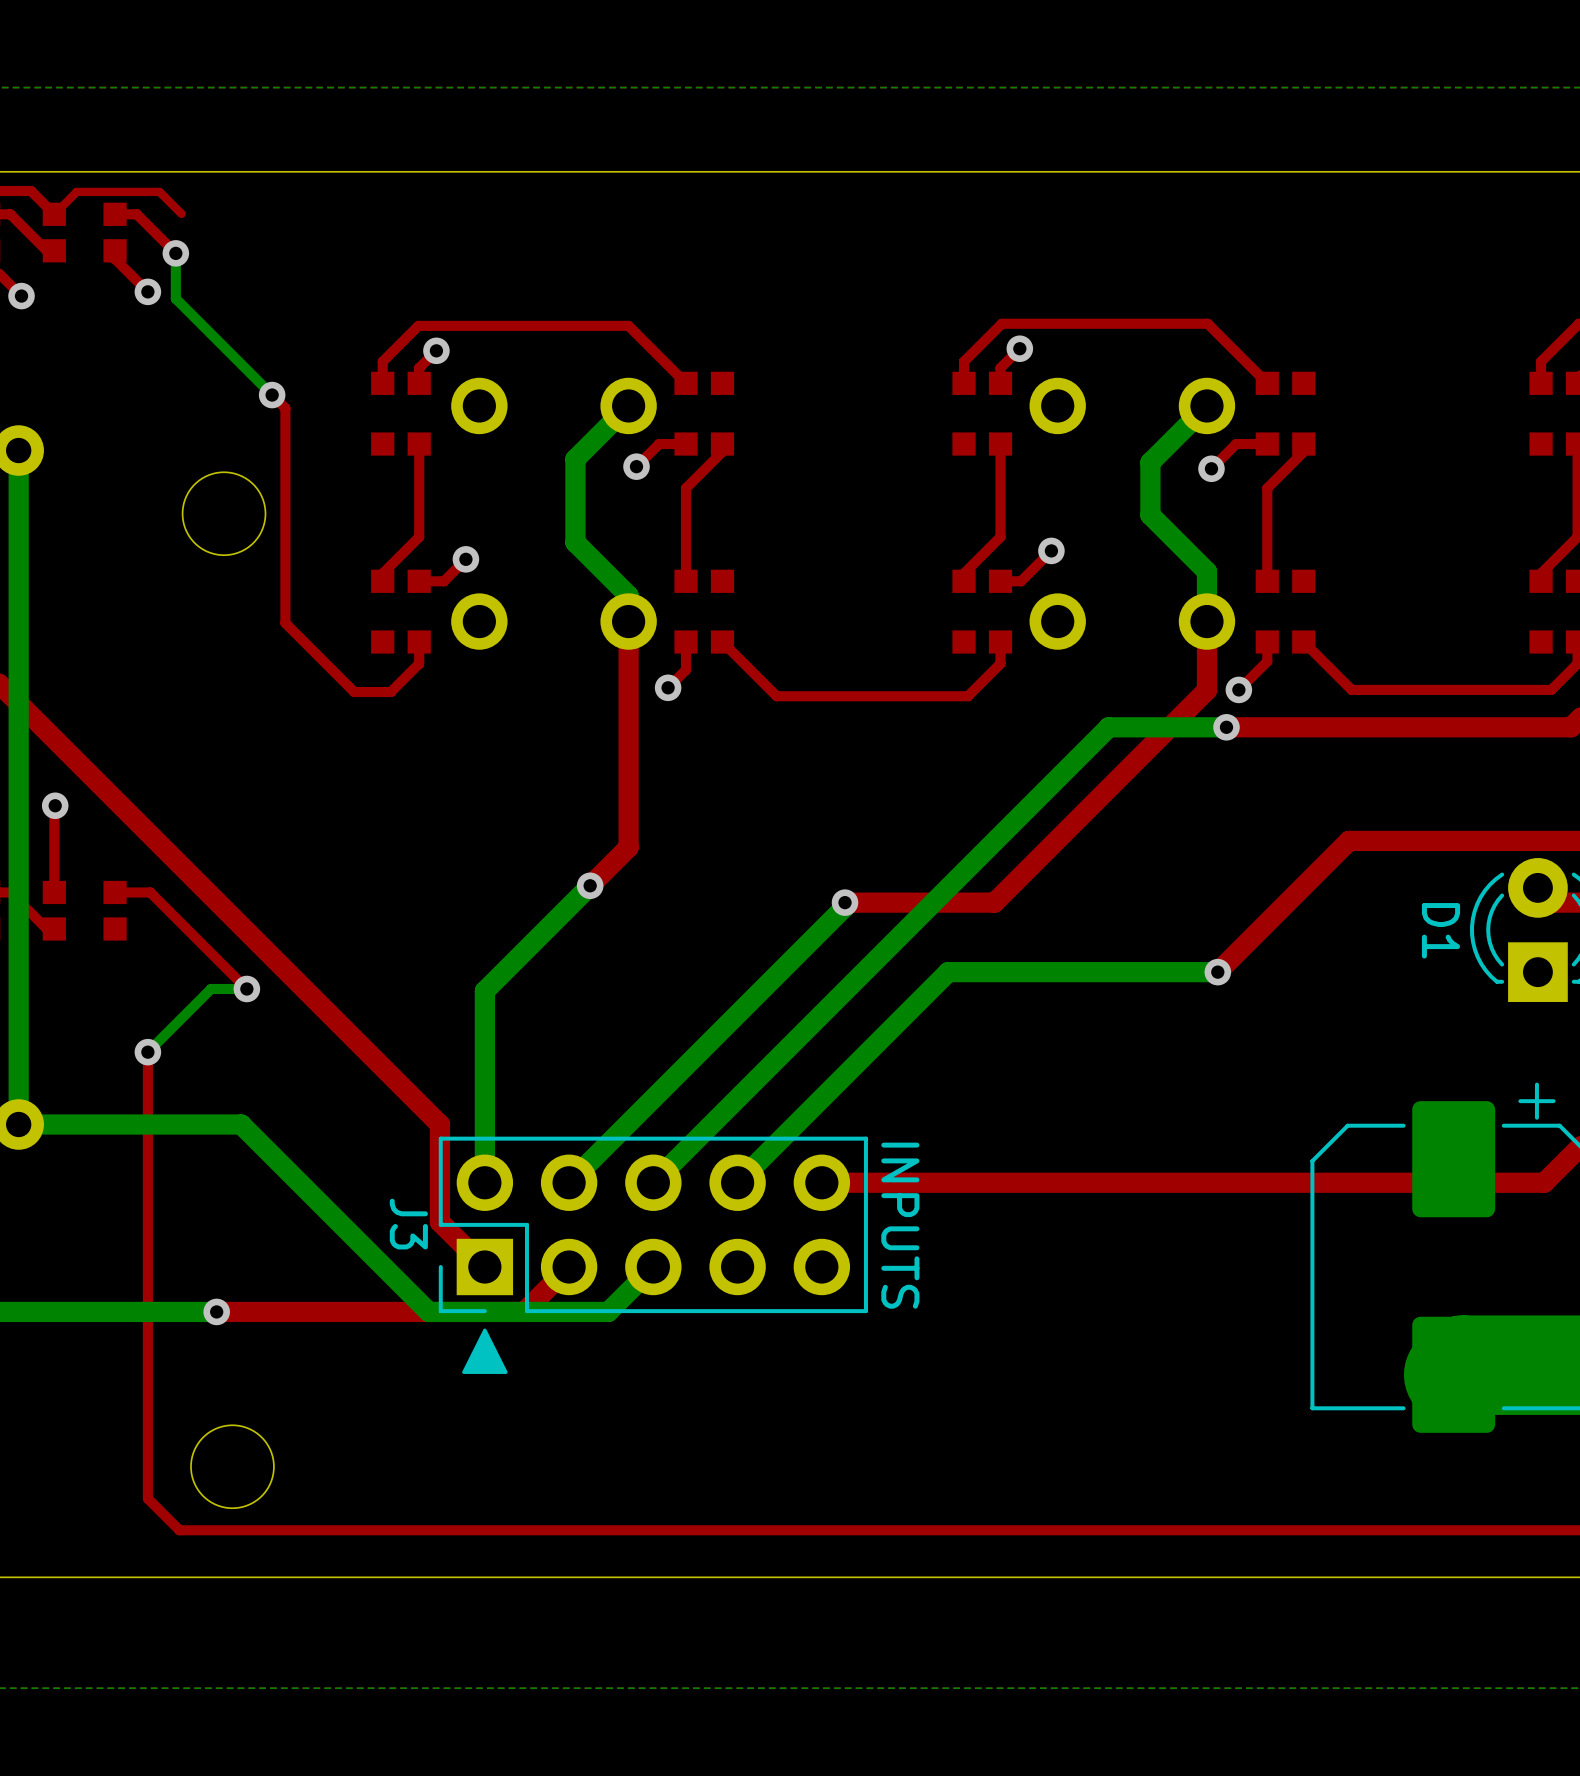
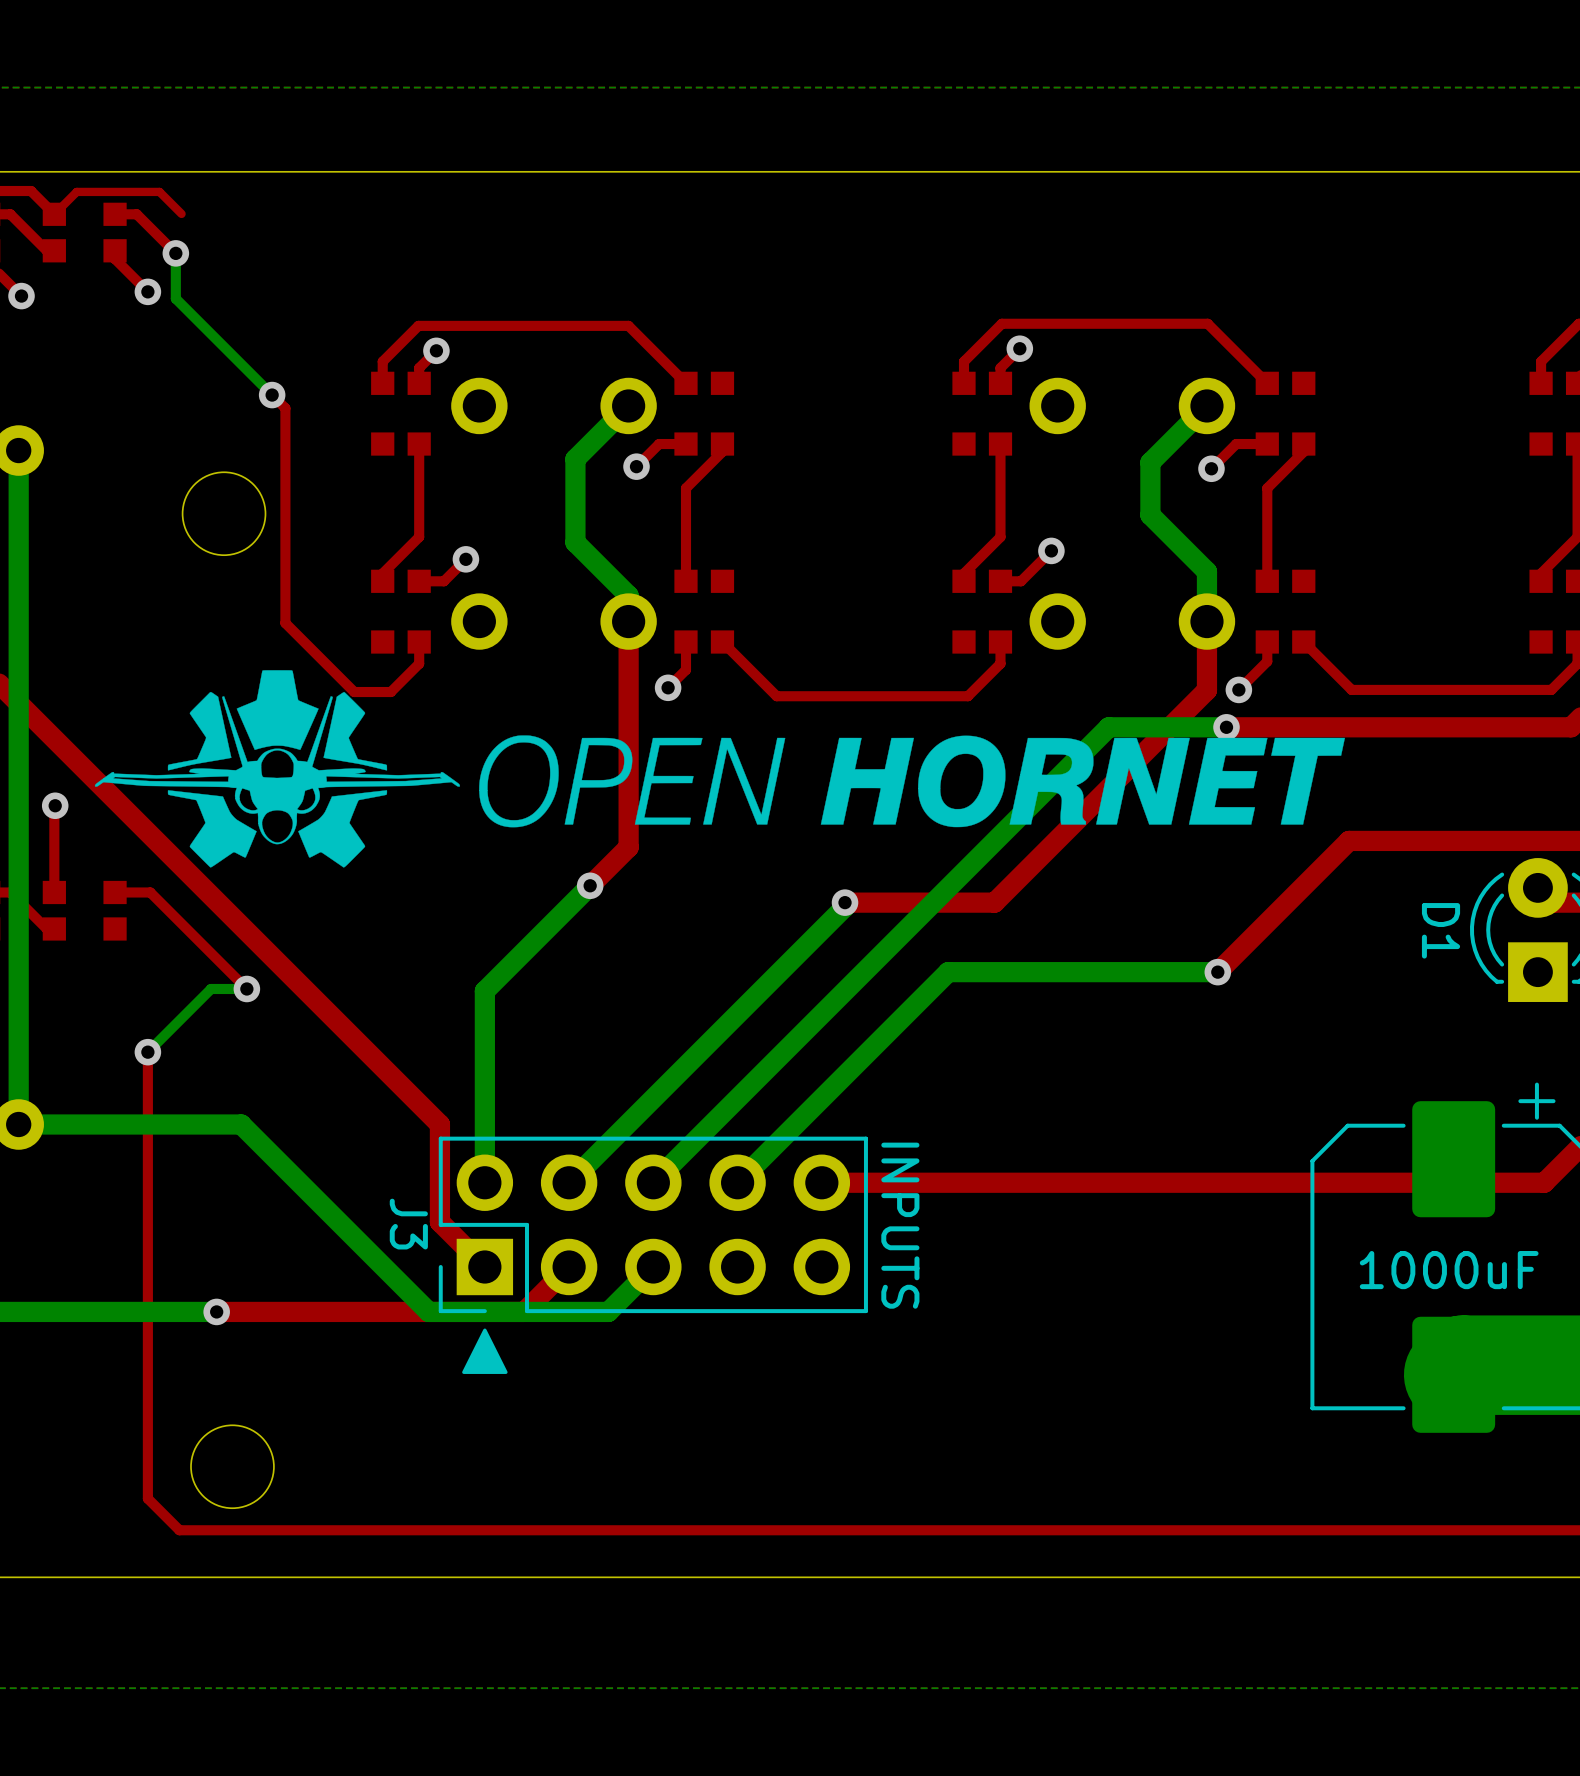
drawing: none -> [94, 670, 1345, 868]
text: none -> 1000uF (1449, 1270)

